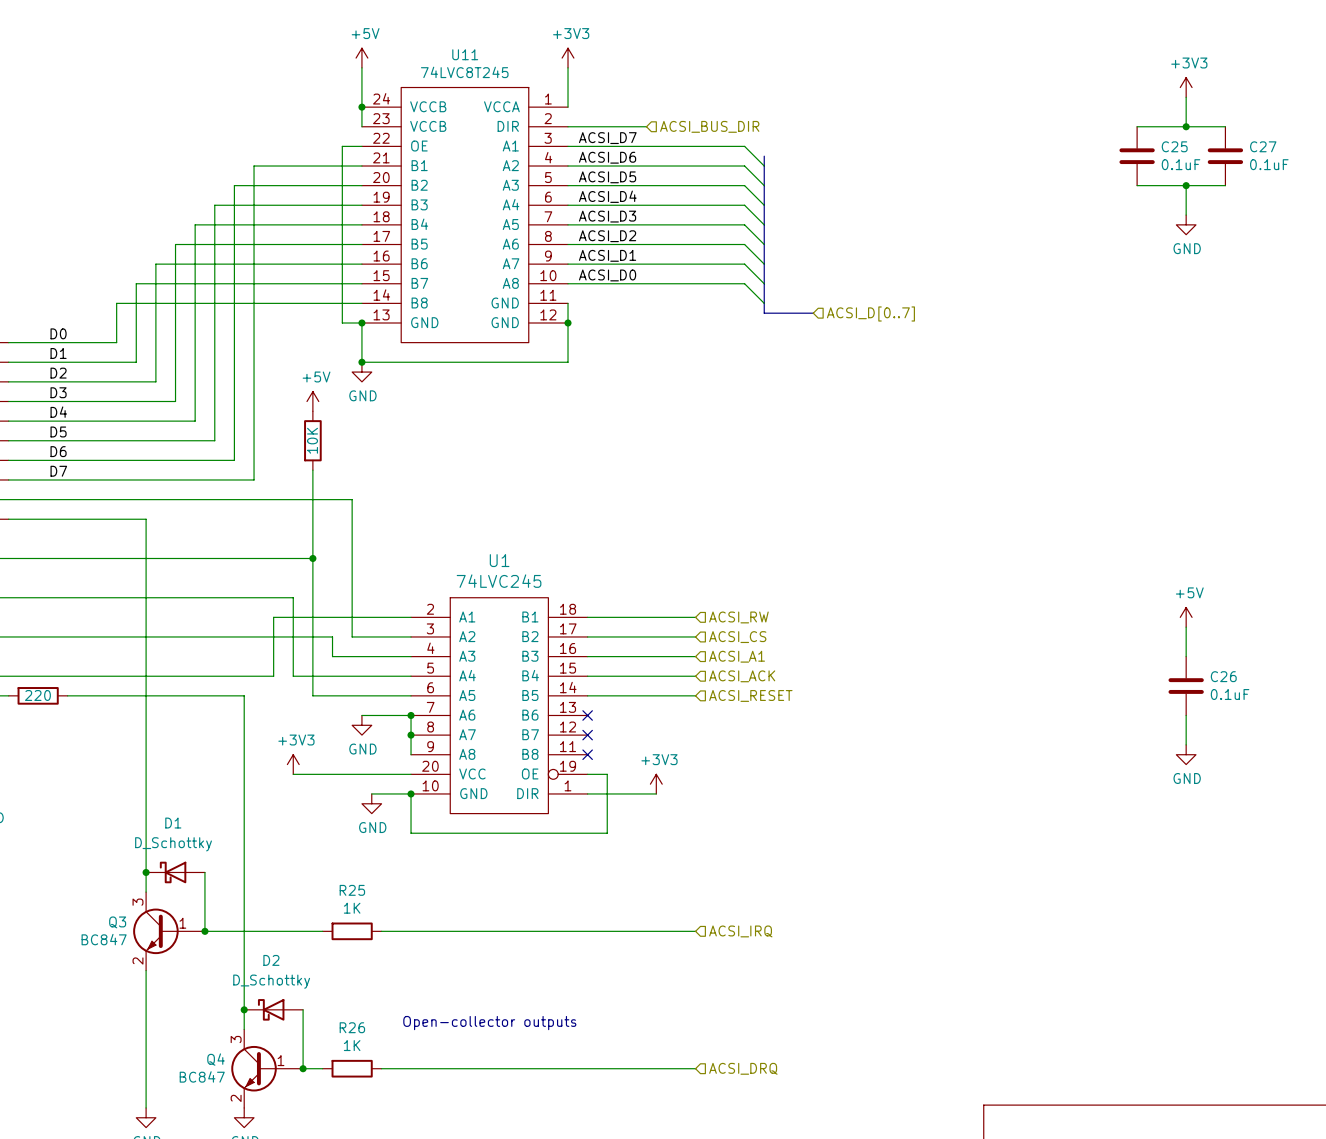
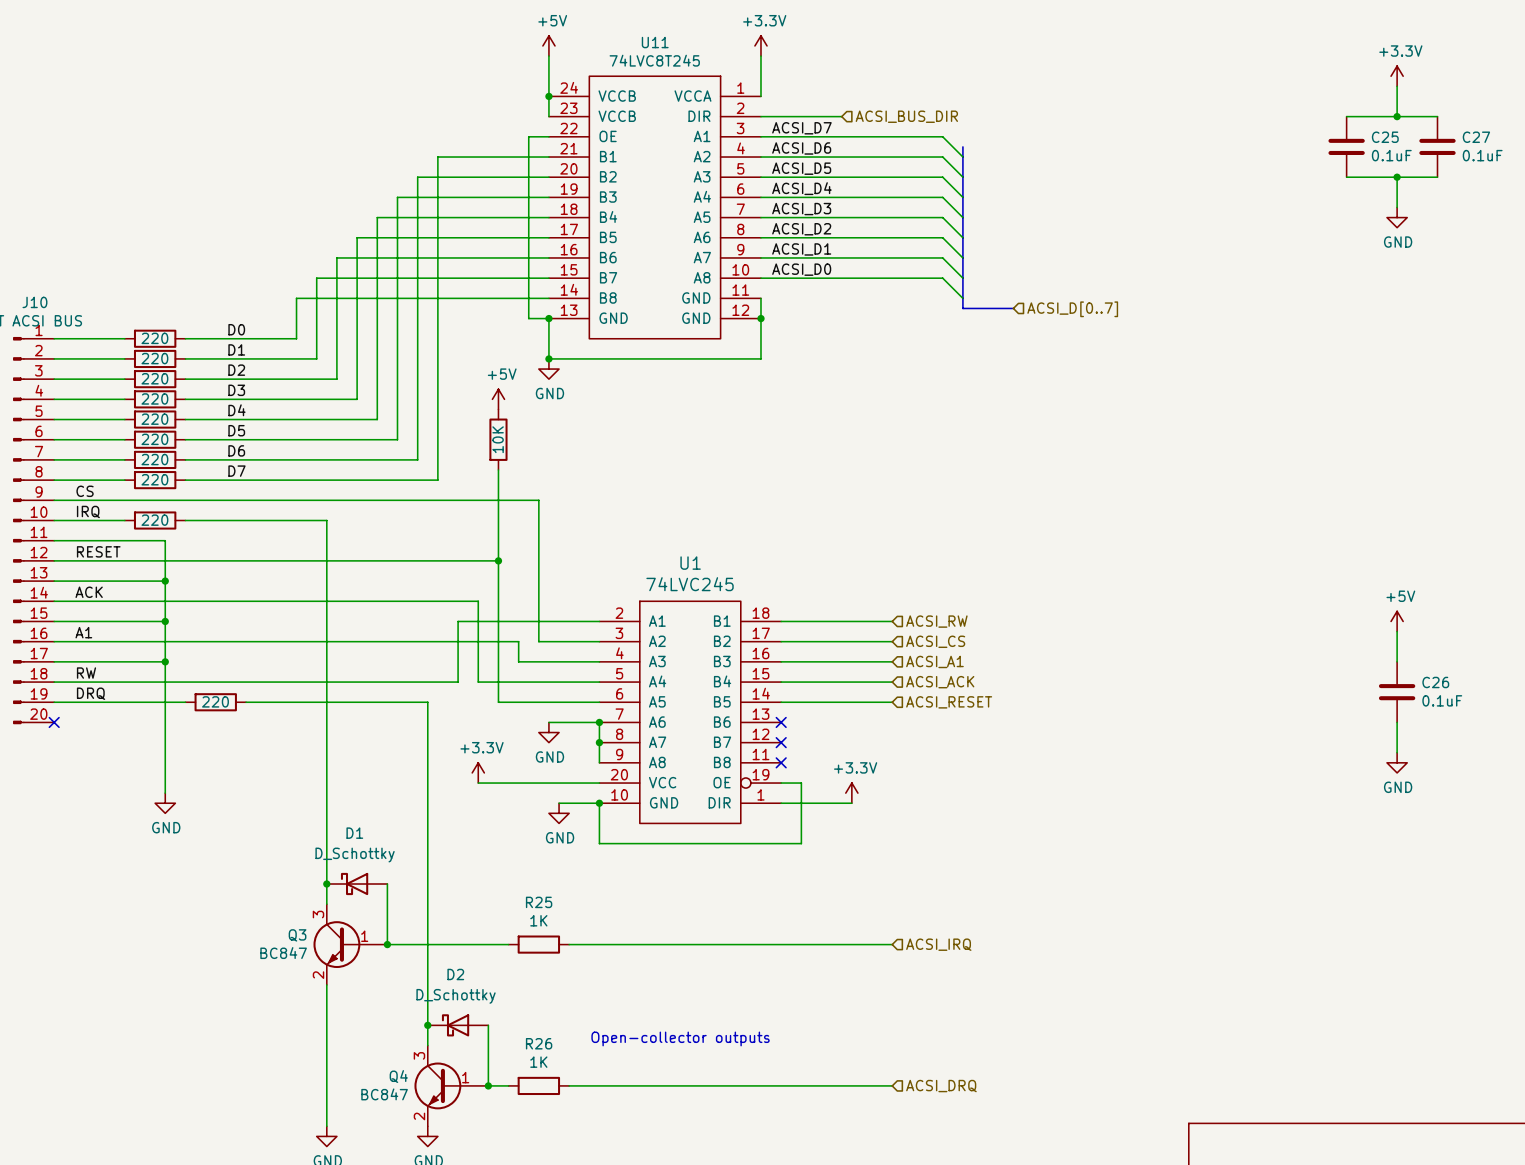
power symbol: +3V3 (568, 58) -> +3.3V (760, 45)
power symbol: +3V3 (1186, 87) -> +3.3V (1397, 76)
power symbol: +3V3 (293, 764) -> +3.3V (478, 772)
power symbol: +3V3 (656, 784) -> +3.3V (851, 793)

